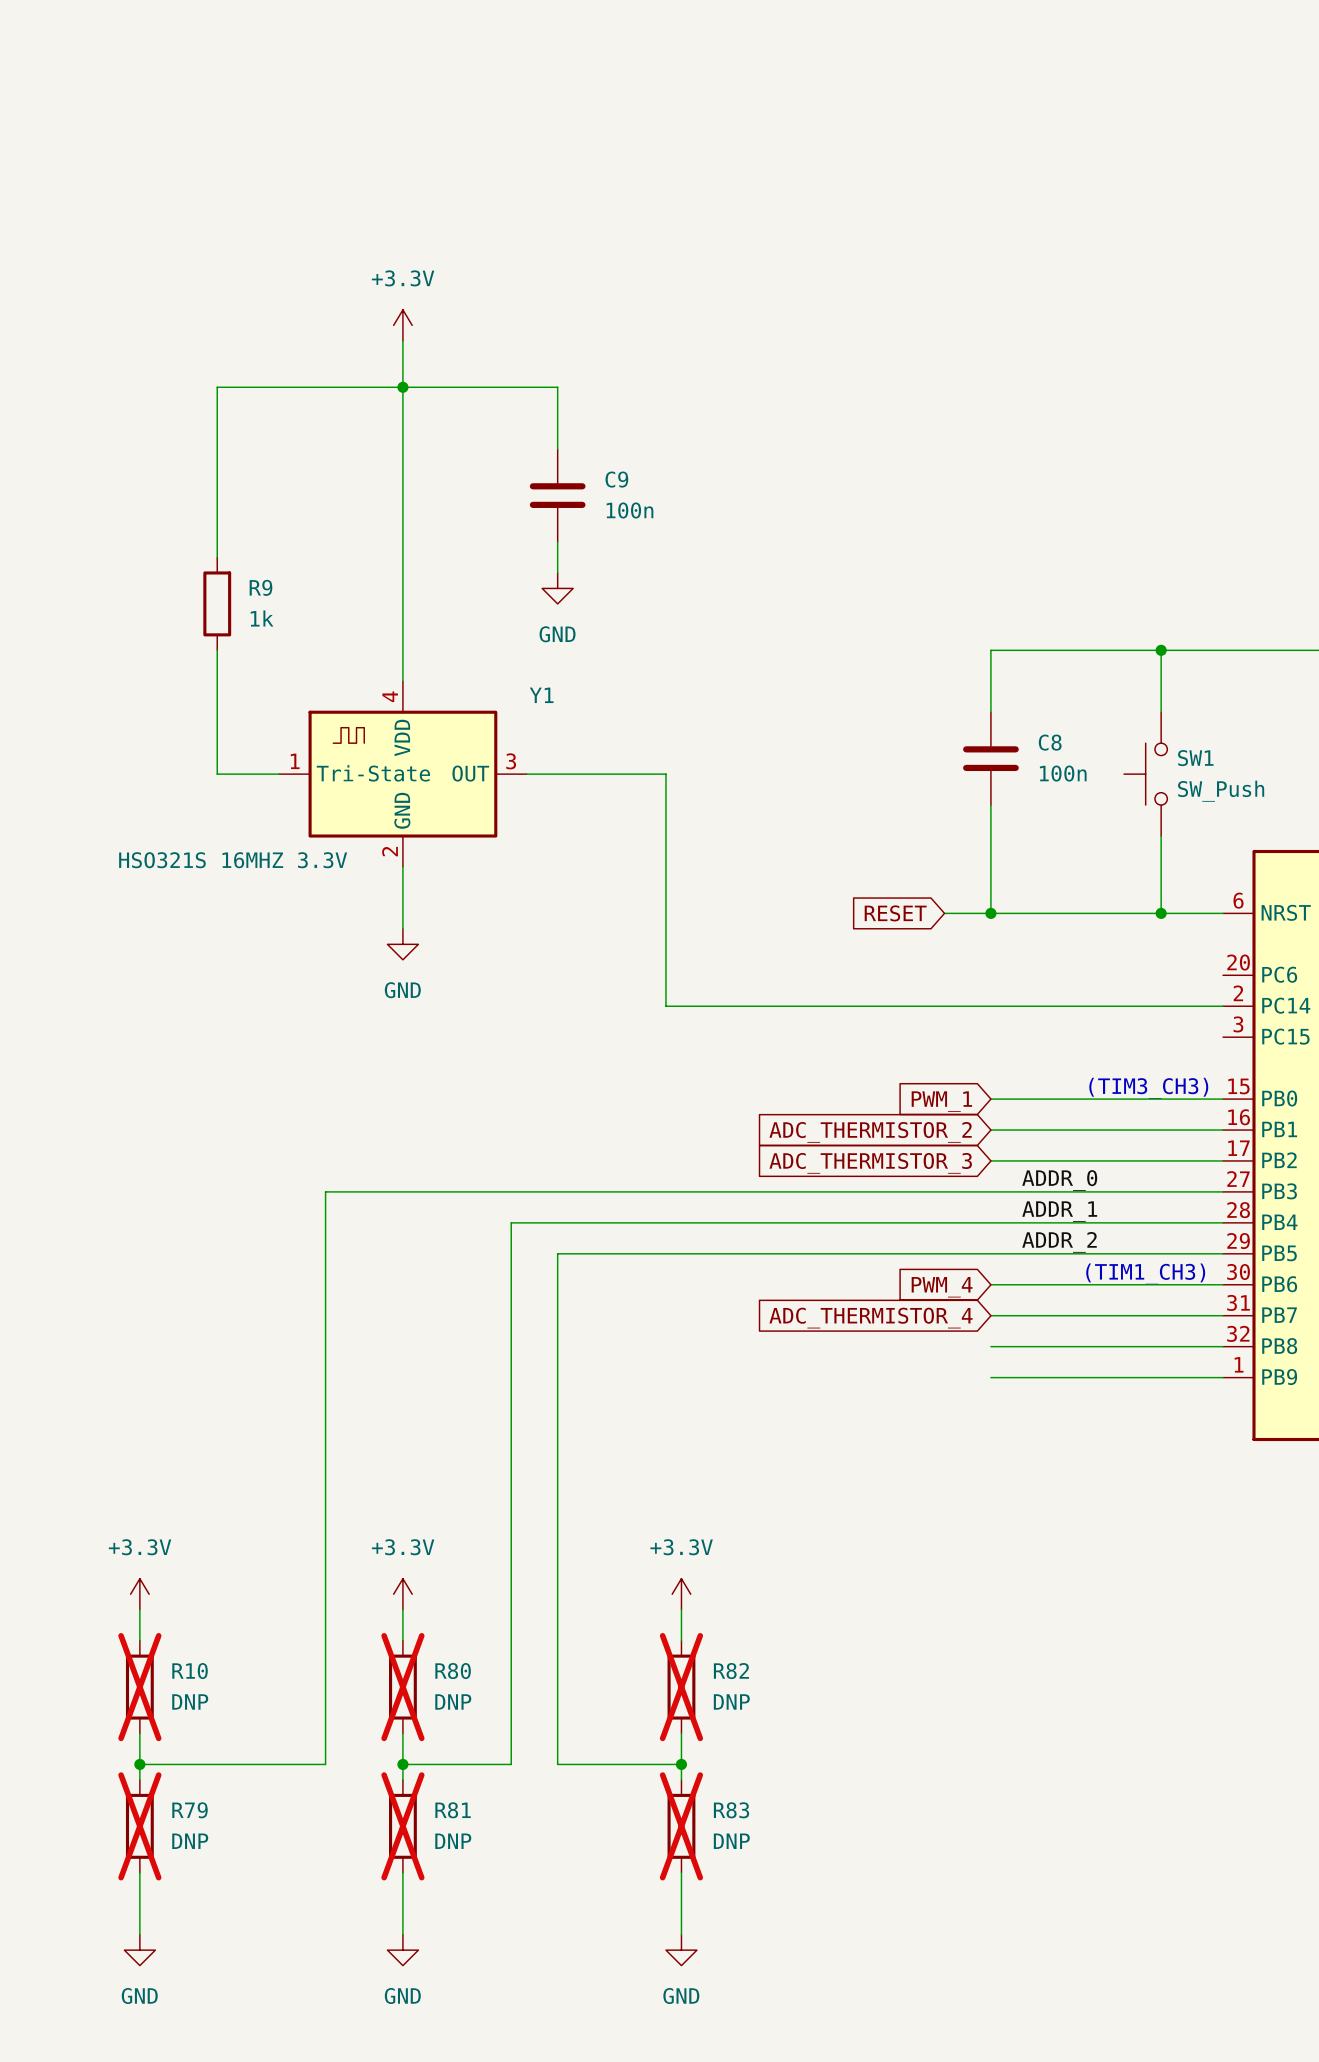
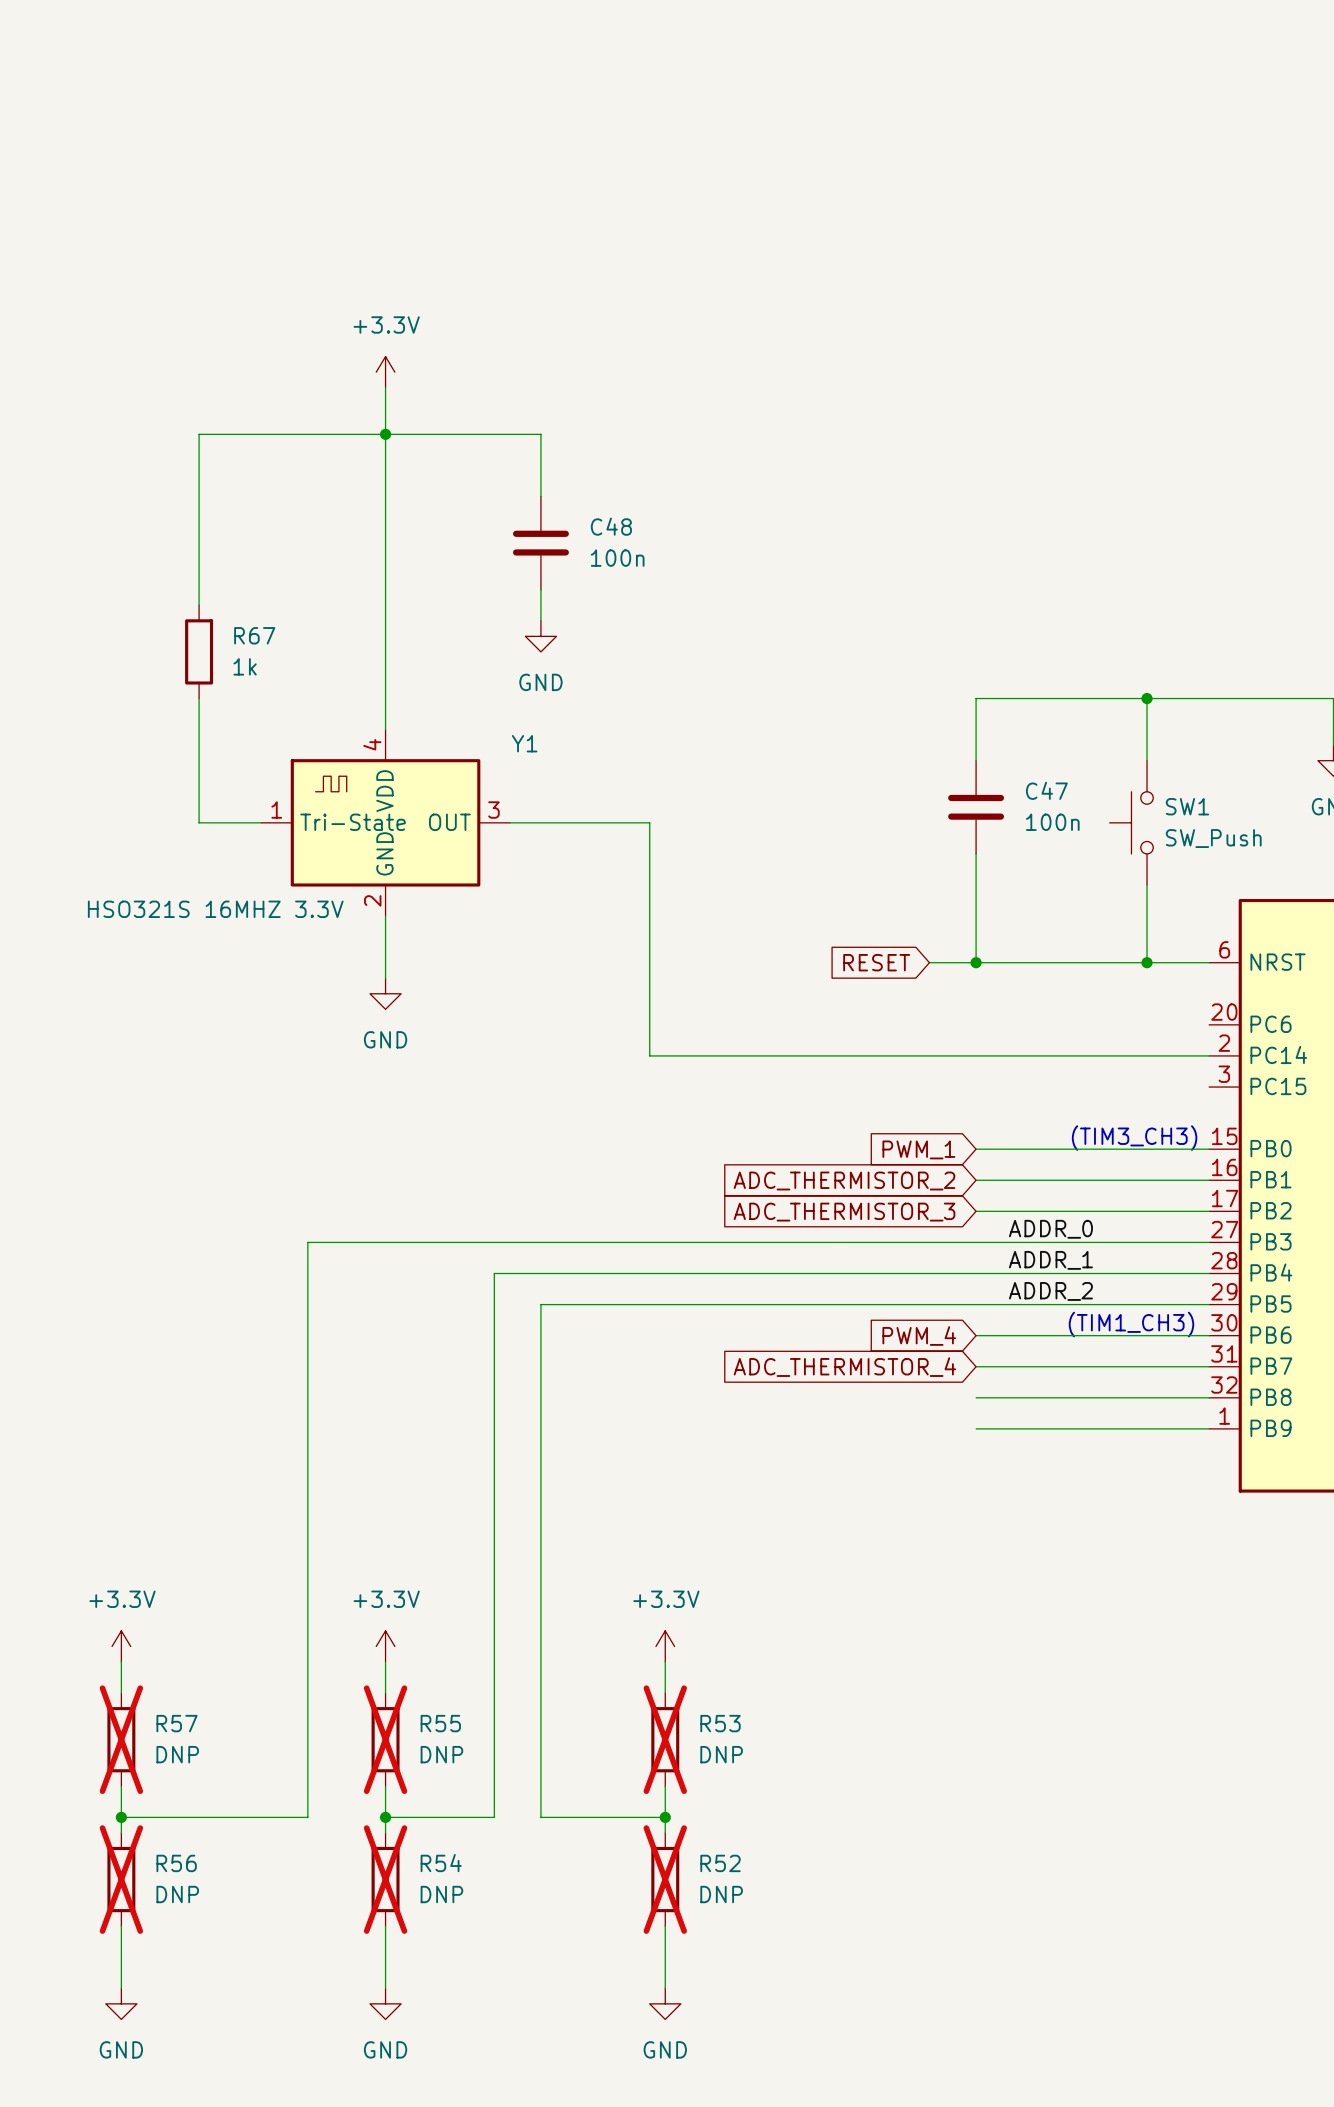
C9 name: C9 (616, 479) -> C48 (611, 526)
R9 name: R9 (260, 587) -> R67 (254, 635)
C8 name: C8 (1050, 742) -> C47 (1046, 790)
R10 name: R10 (190, 1671) -> R57 (176, 1723)
R80 name: R80 (453, 1671) -> R55 (440, 1723)
R82 name: R82 (731, 1671) -> R53 (720, 1723)
R79 name: R79 (190, 1810) -> R56 (176, 1863)
R81 name: R81 (453, 1810) -> R54 (441, 1863)
R83 name: R83 (731, 1810) -> R52 (720, 1863)

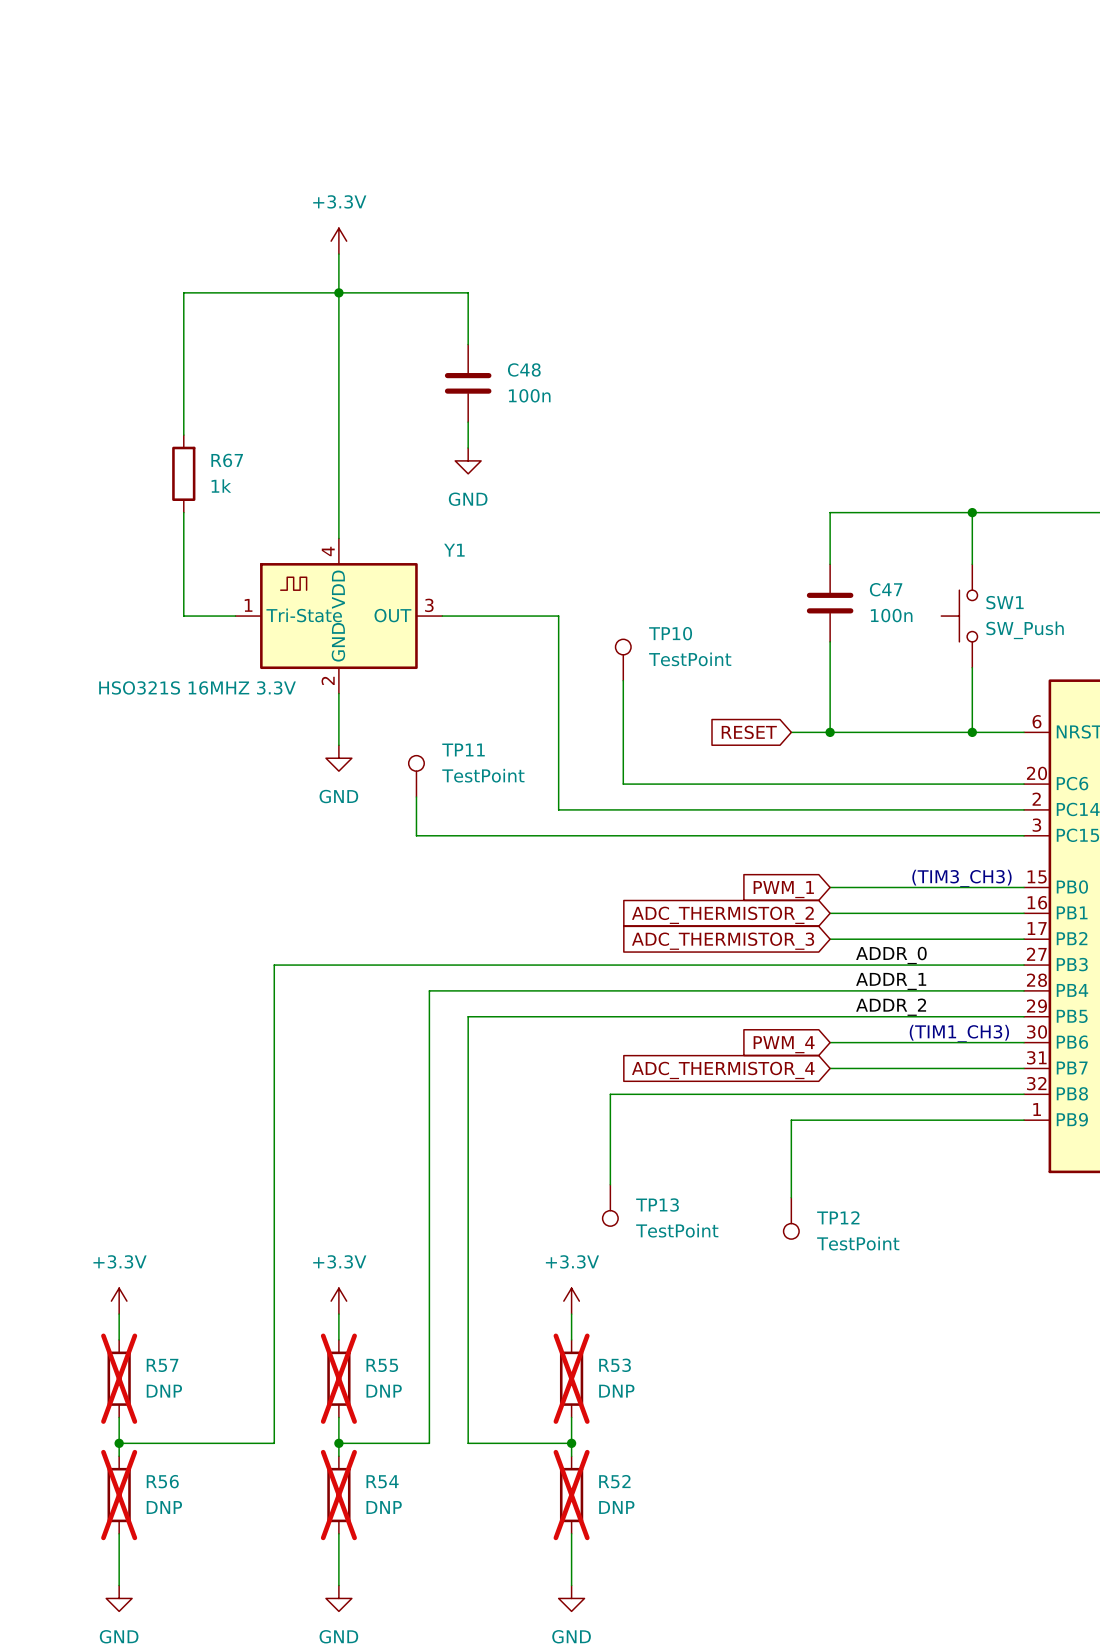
TP10: none -> TestPoint (623, 659)
wire: none -> (623, 680) (623, 784) (1024, 784)
TP11: none -> TestPoint (416, 776)
wire: none -> (416, 797) (416, 835) (1024, 835)
wire: none -> (830, 1094) (610, 1094) (610, 1184)
wire: none -> (830, 1120) (791, 1120) (791, 1197)
TP13: none -> TestPoint (610, 1205)
TP12: none -> TestPoint (791, 1218)

